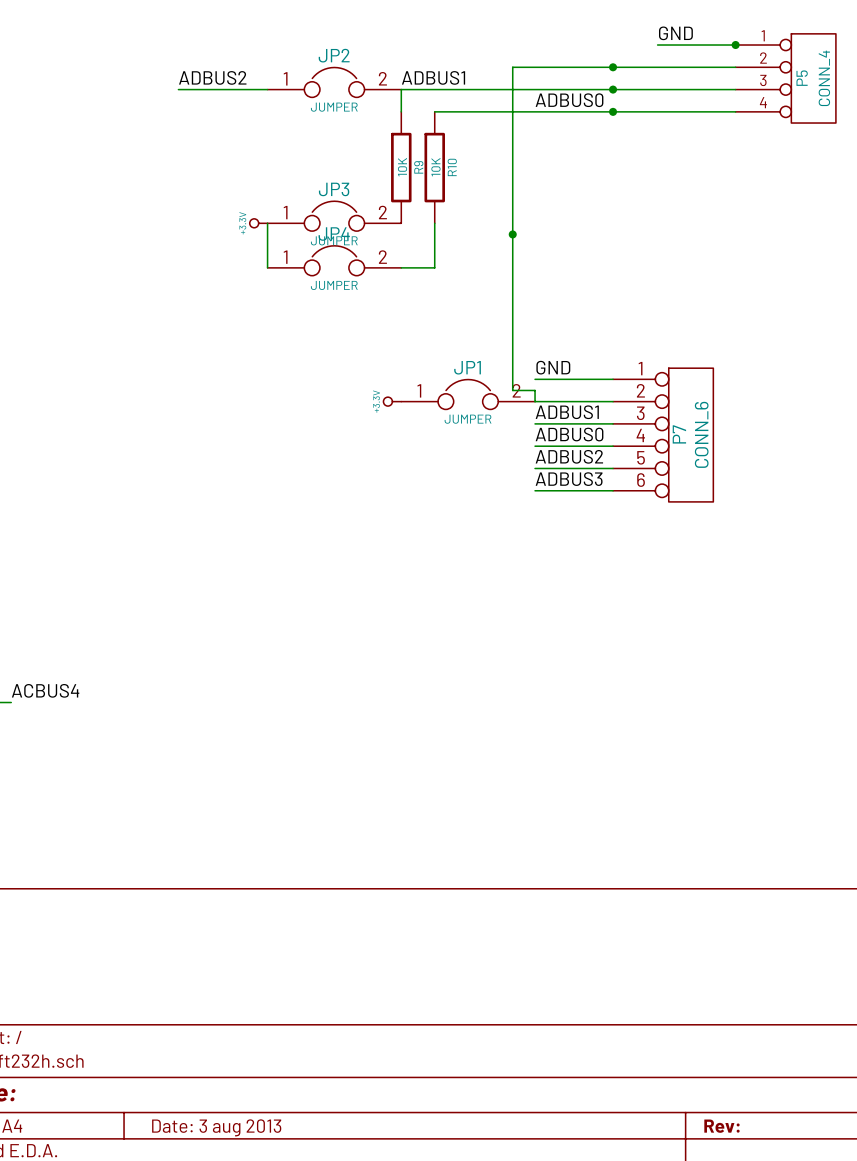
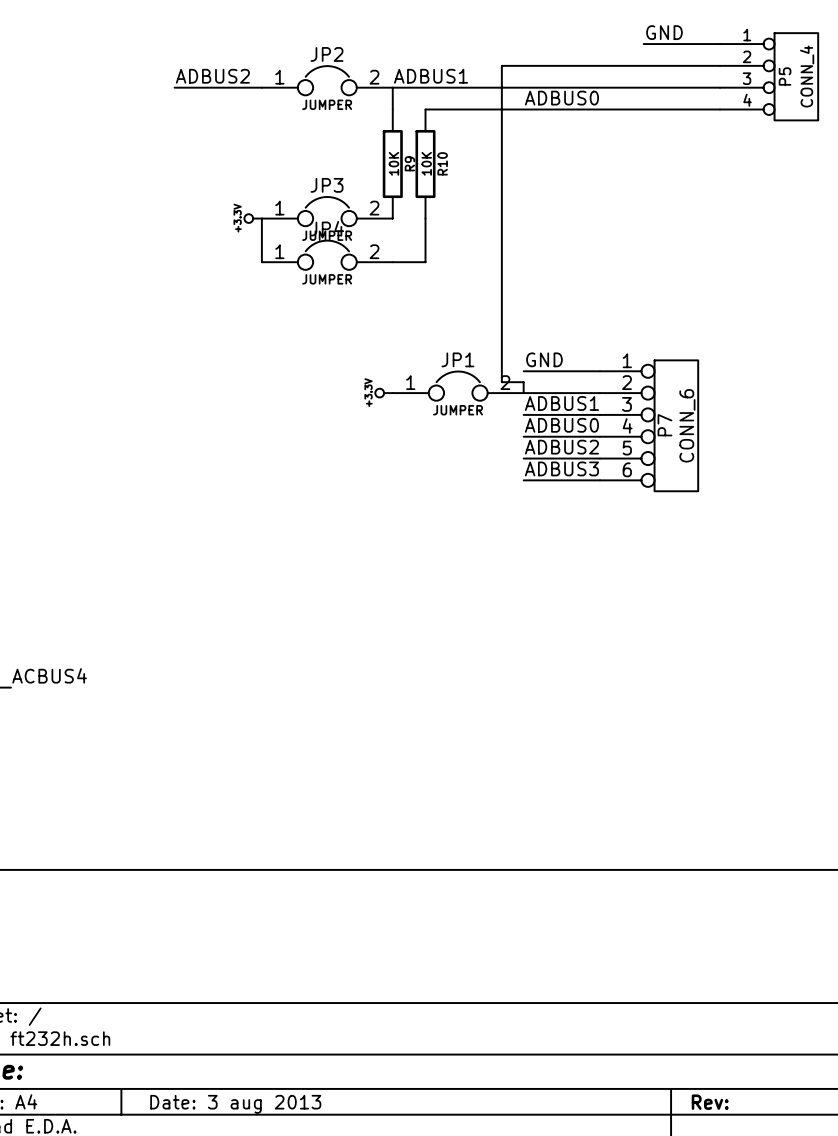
junction: (735, 45) -> none
junction: (613, 67) -> none
junction: (613, 89) -> none
junction: (613, 111) -> none
junction: (512, 234) -> none

